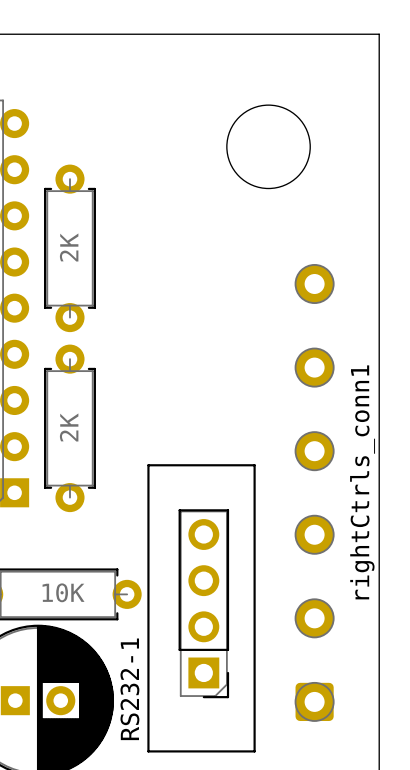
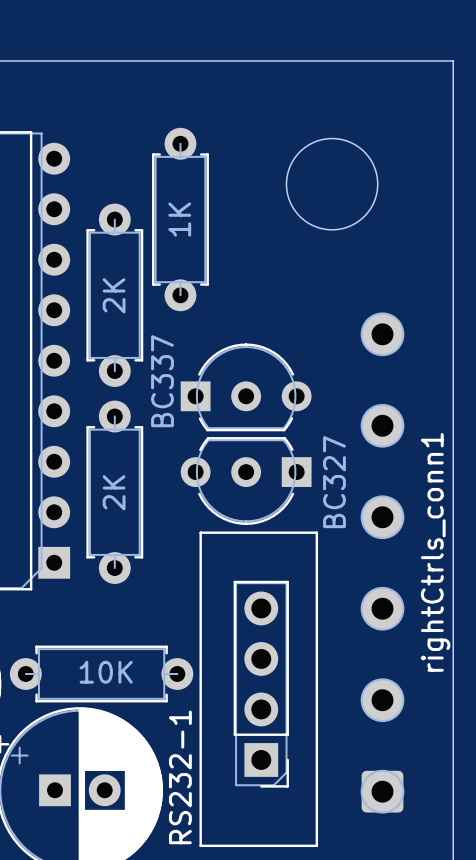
part: none -> 1K (180, 219)
part: none -> BC337 (246, 387)
part: none -> BC327 (246, 481)

